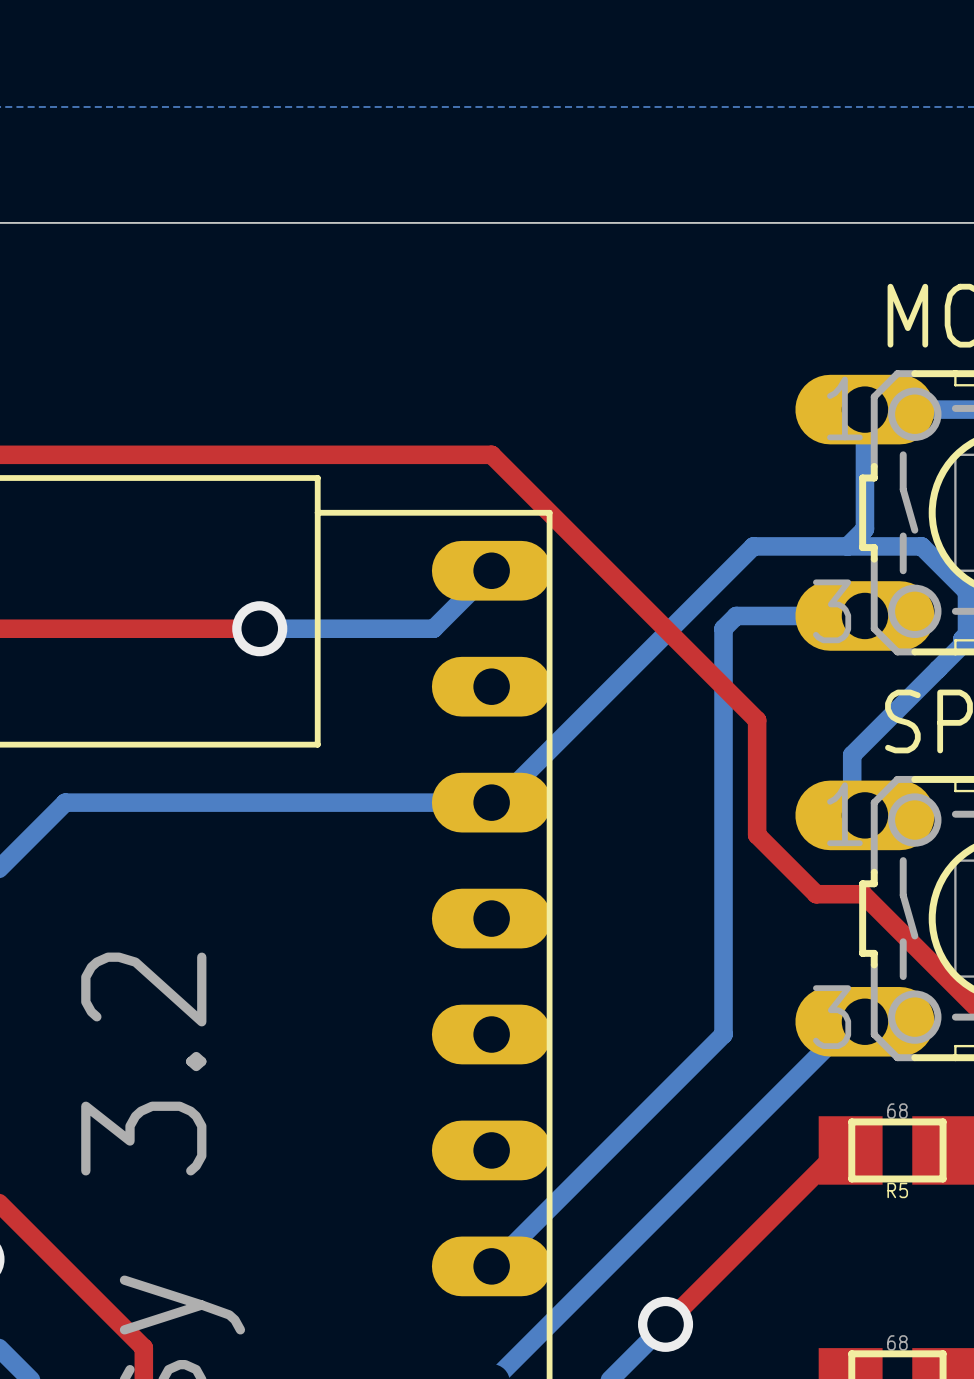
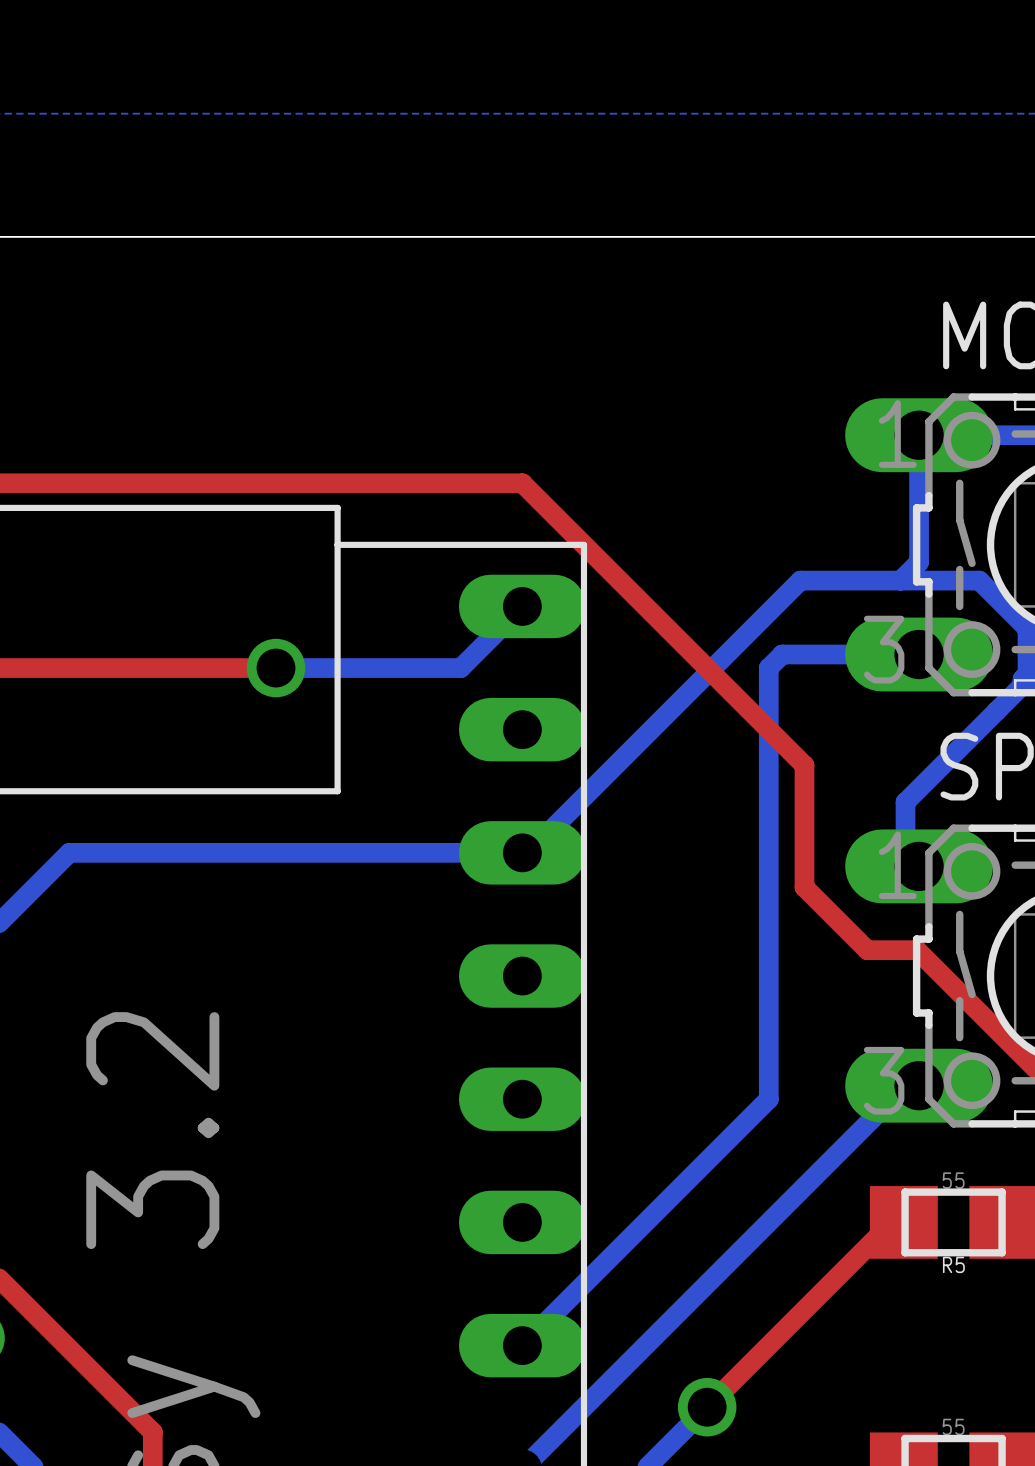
R5 value: 68 (897, 1111) -> 55 (953, 1180)
part value: 68 (897, 1342) -> 55 (953, 1426)

